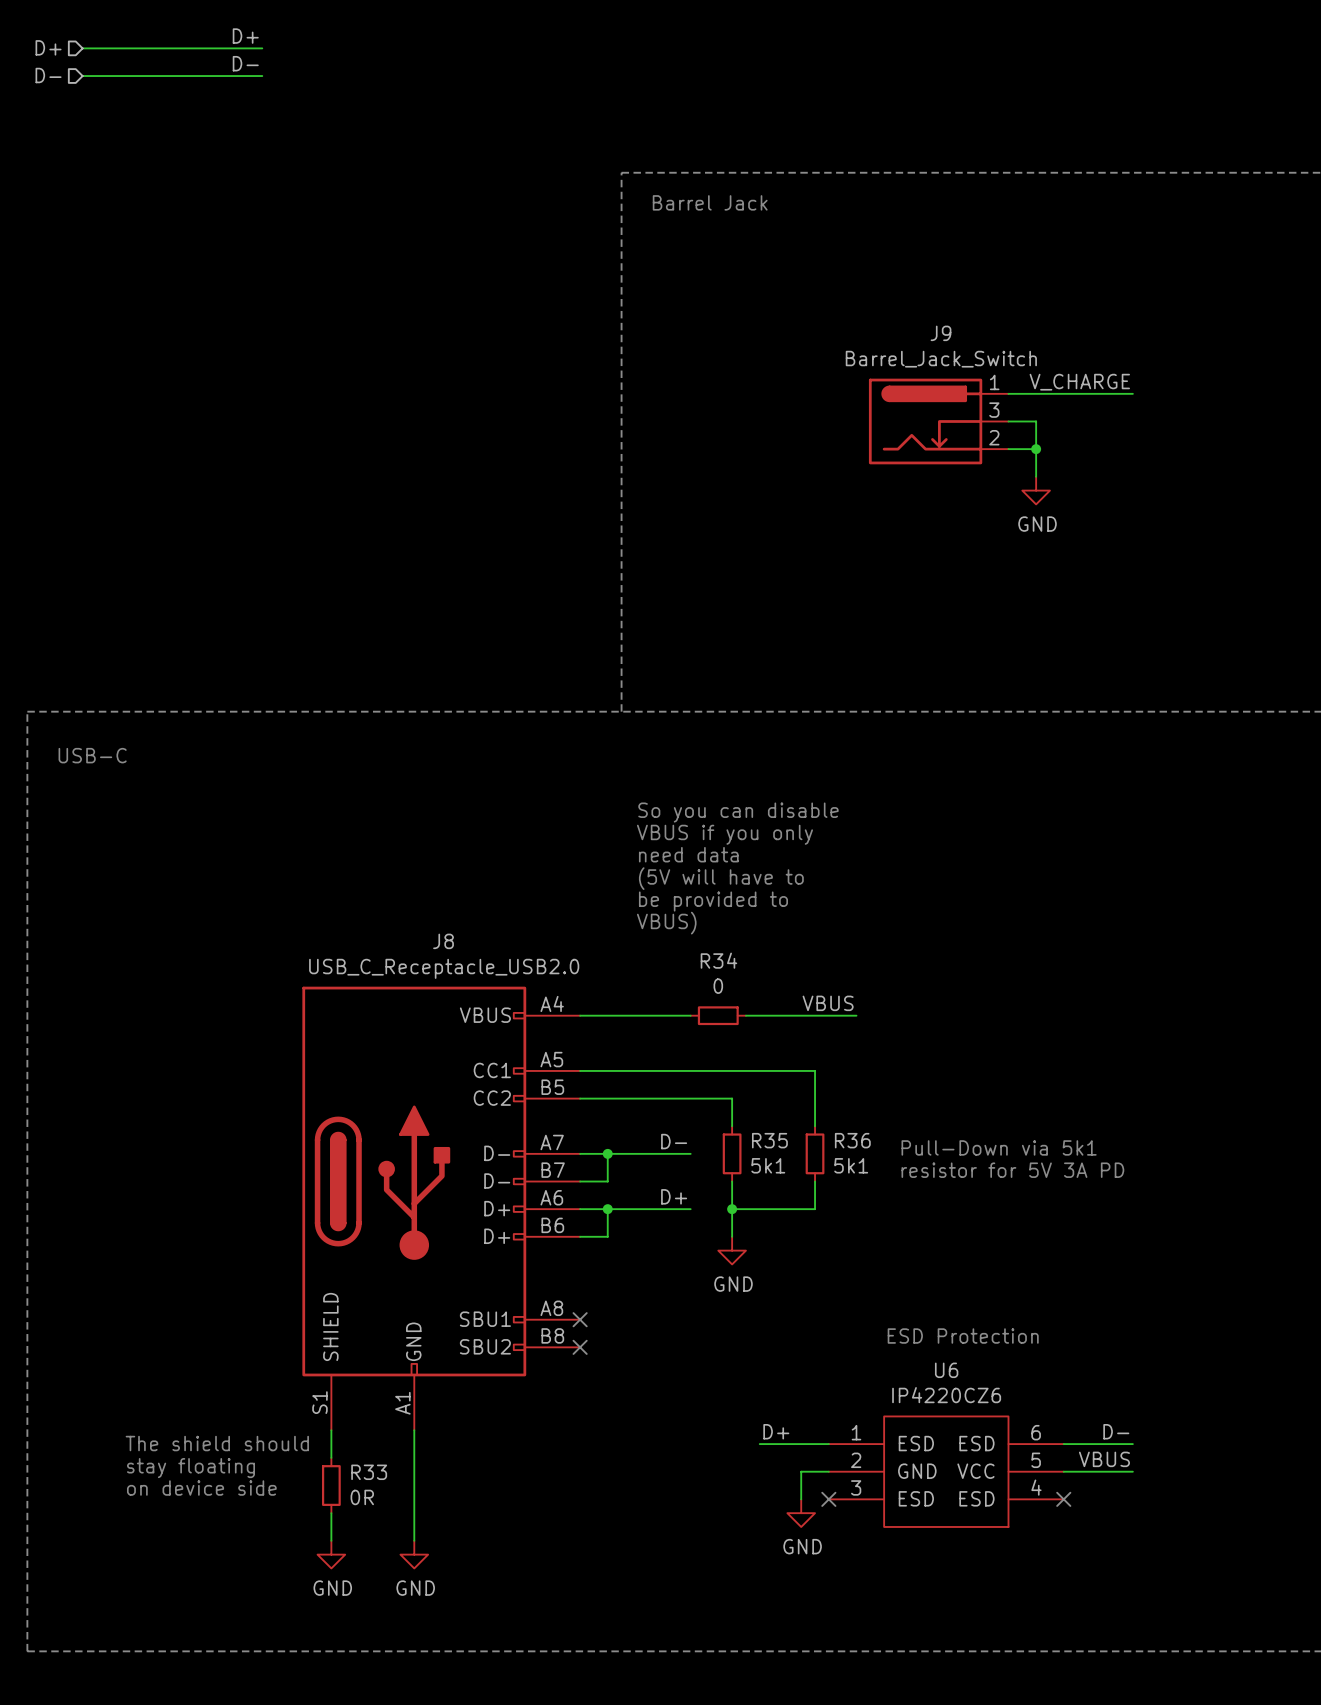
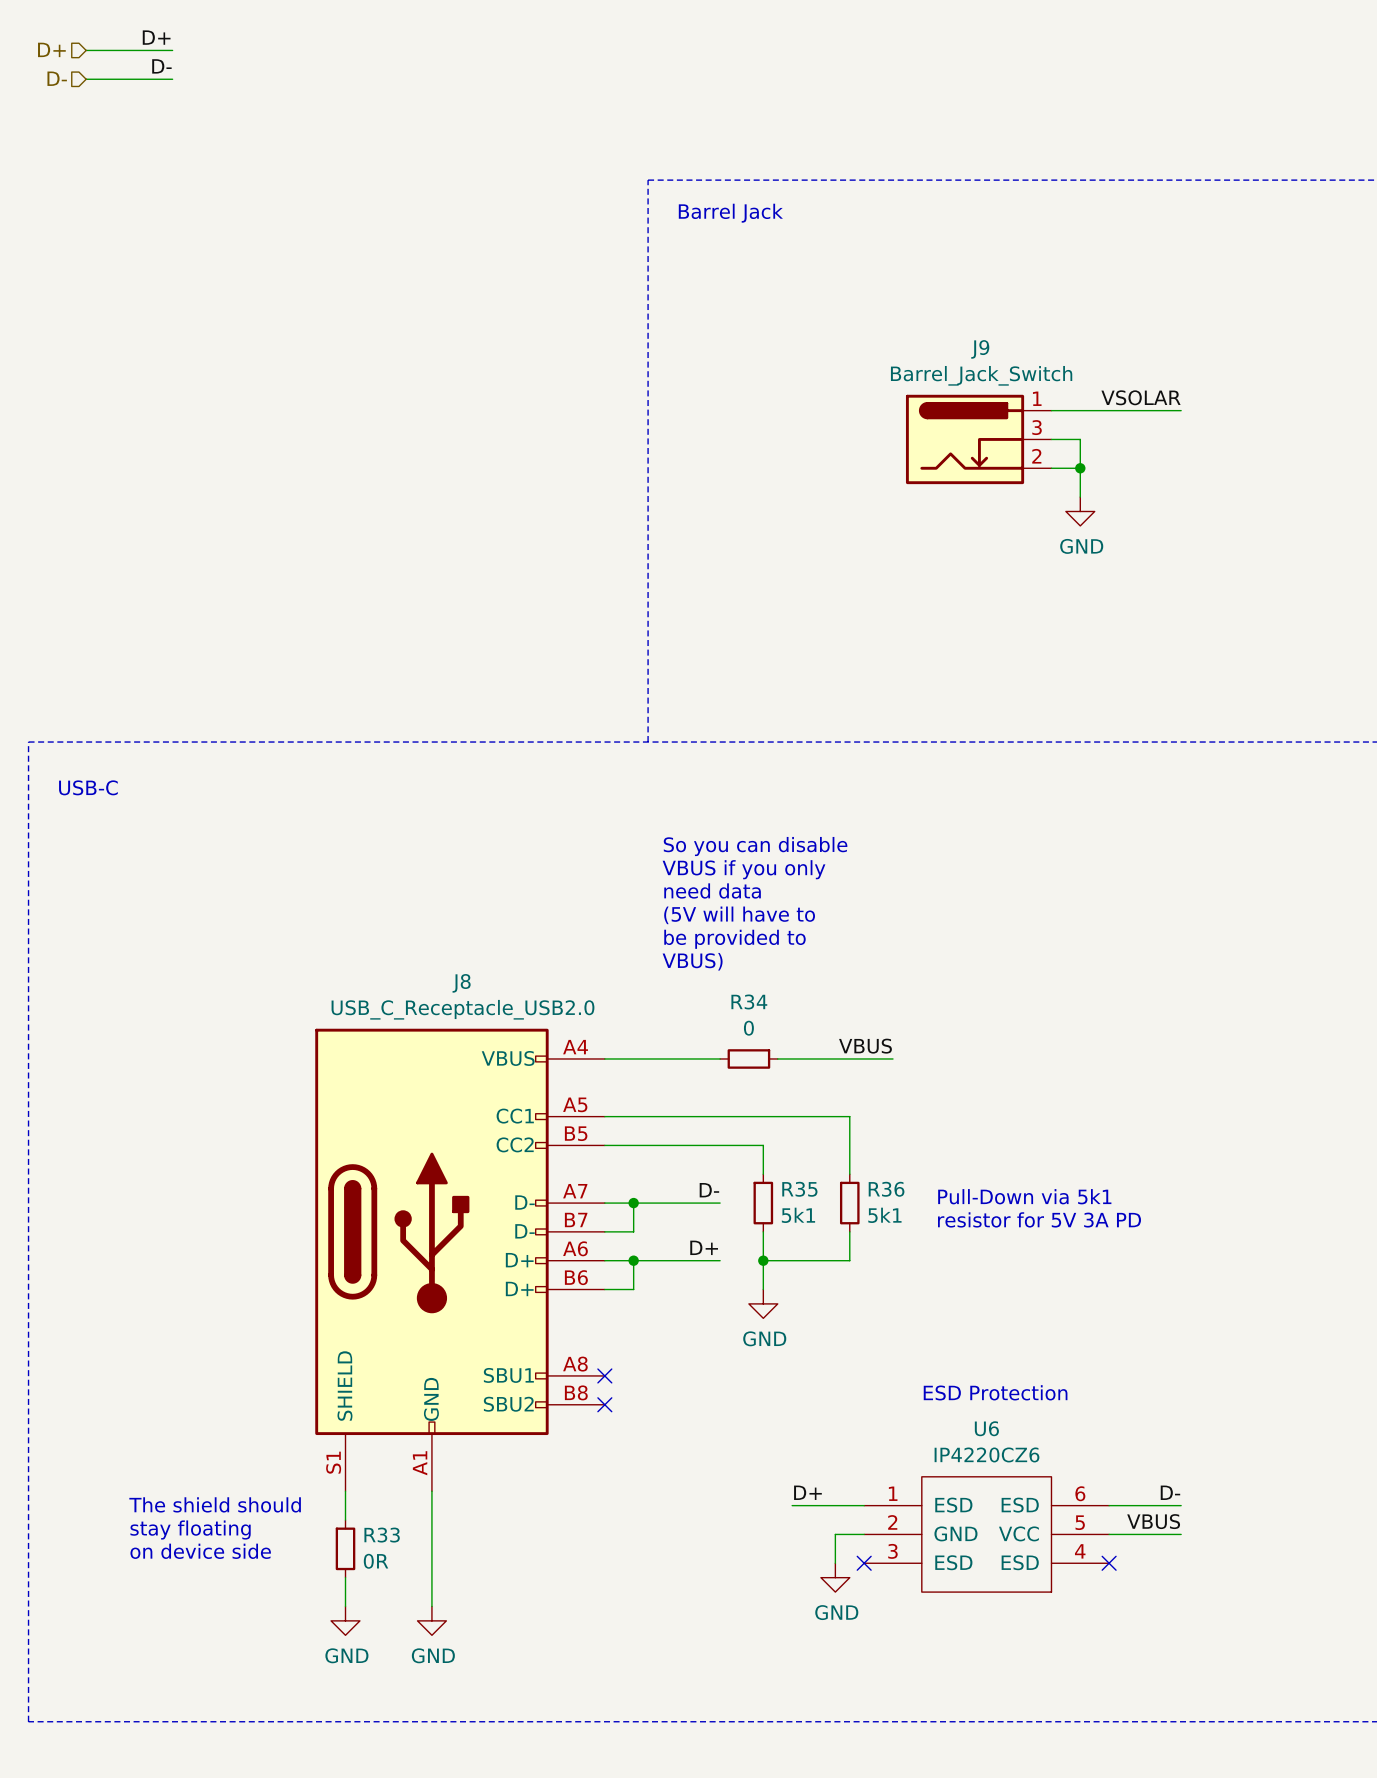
label position: D+ (245, 36) -> D+ (156, 37)
wire: (165, 48) (262, 48) -> none
label position: D- (245, 63) -> D- (161, 66)
wire: (165, 76) (262, 76) -> none
label: V_CHARGE (1079, 382) -> VSOLAR (1141, 397)

